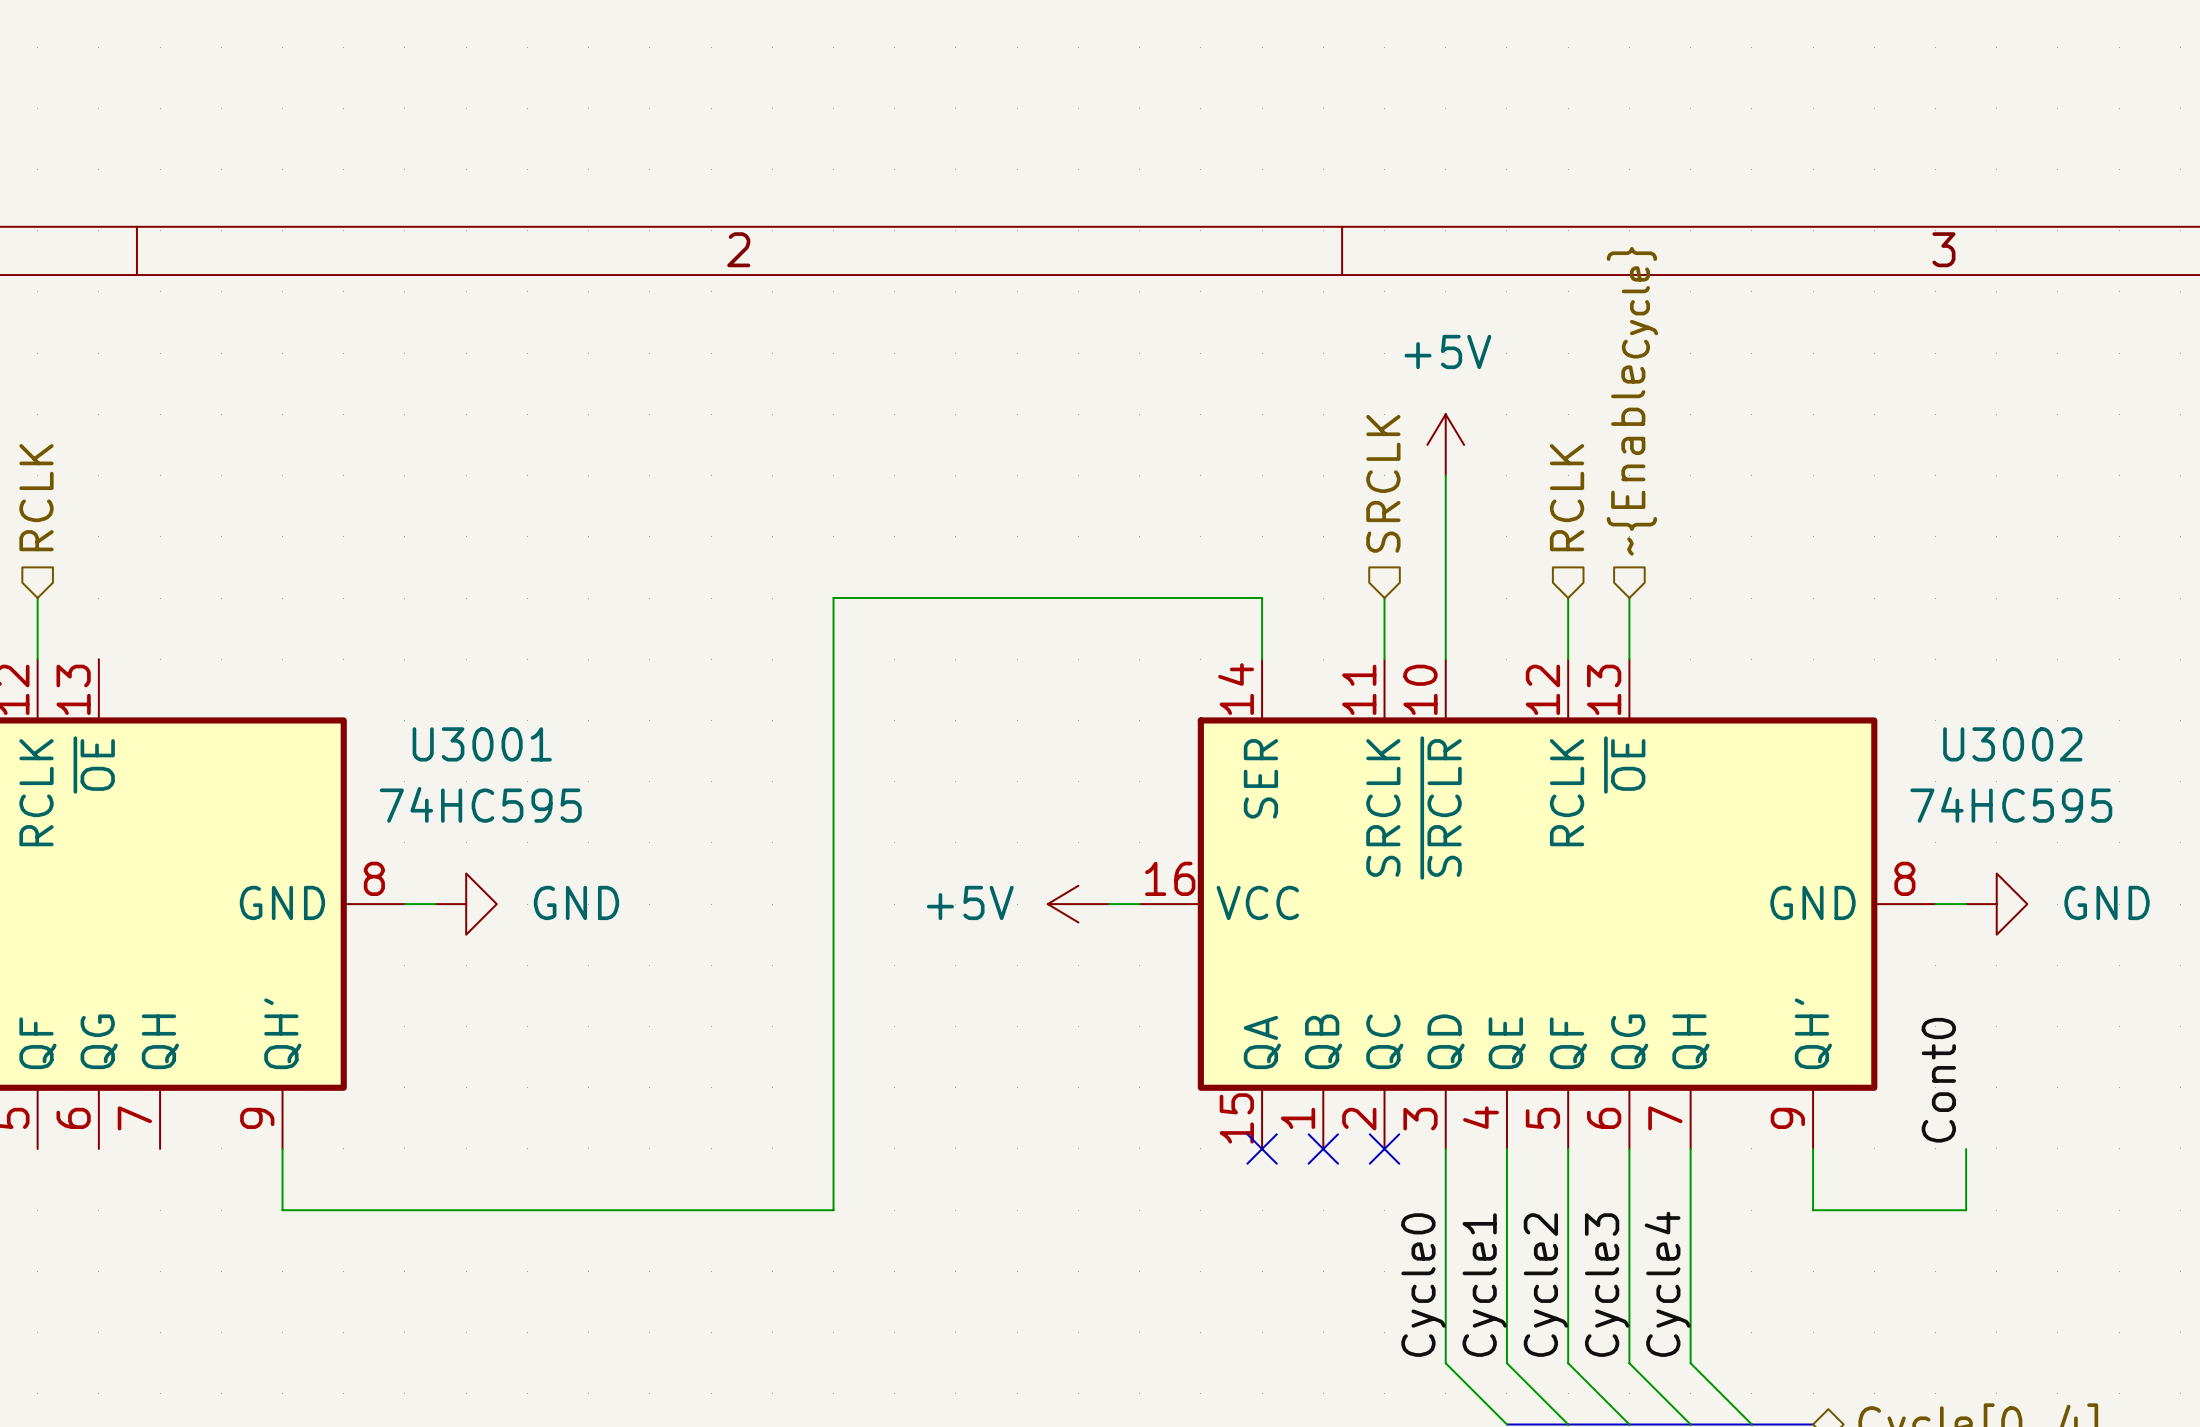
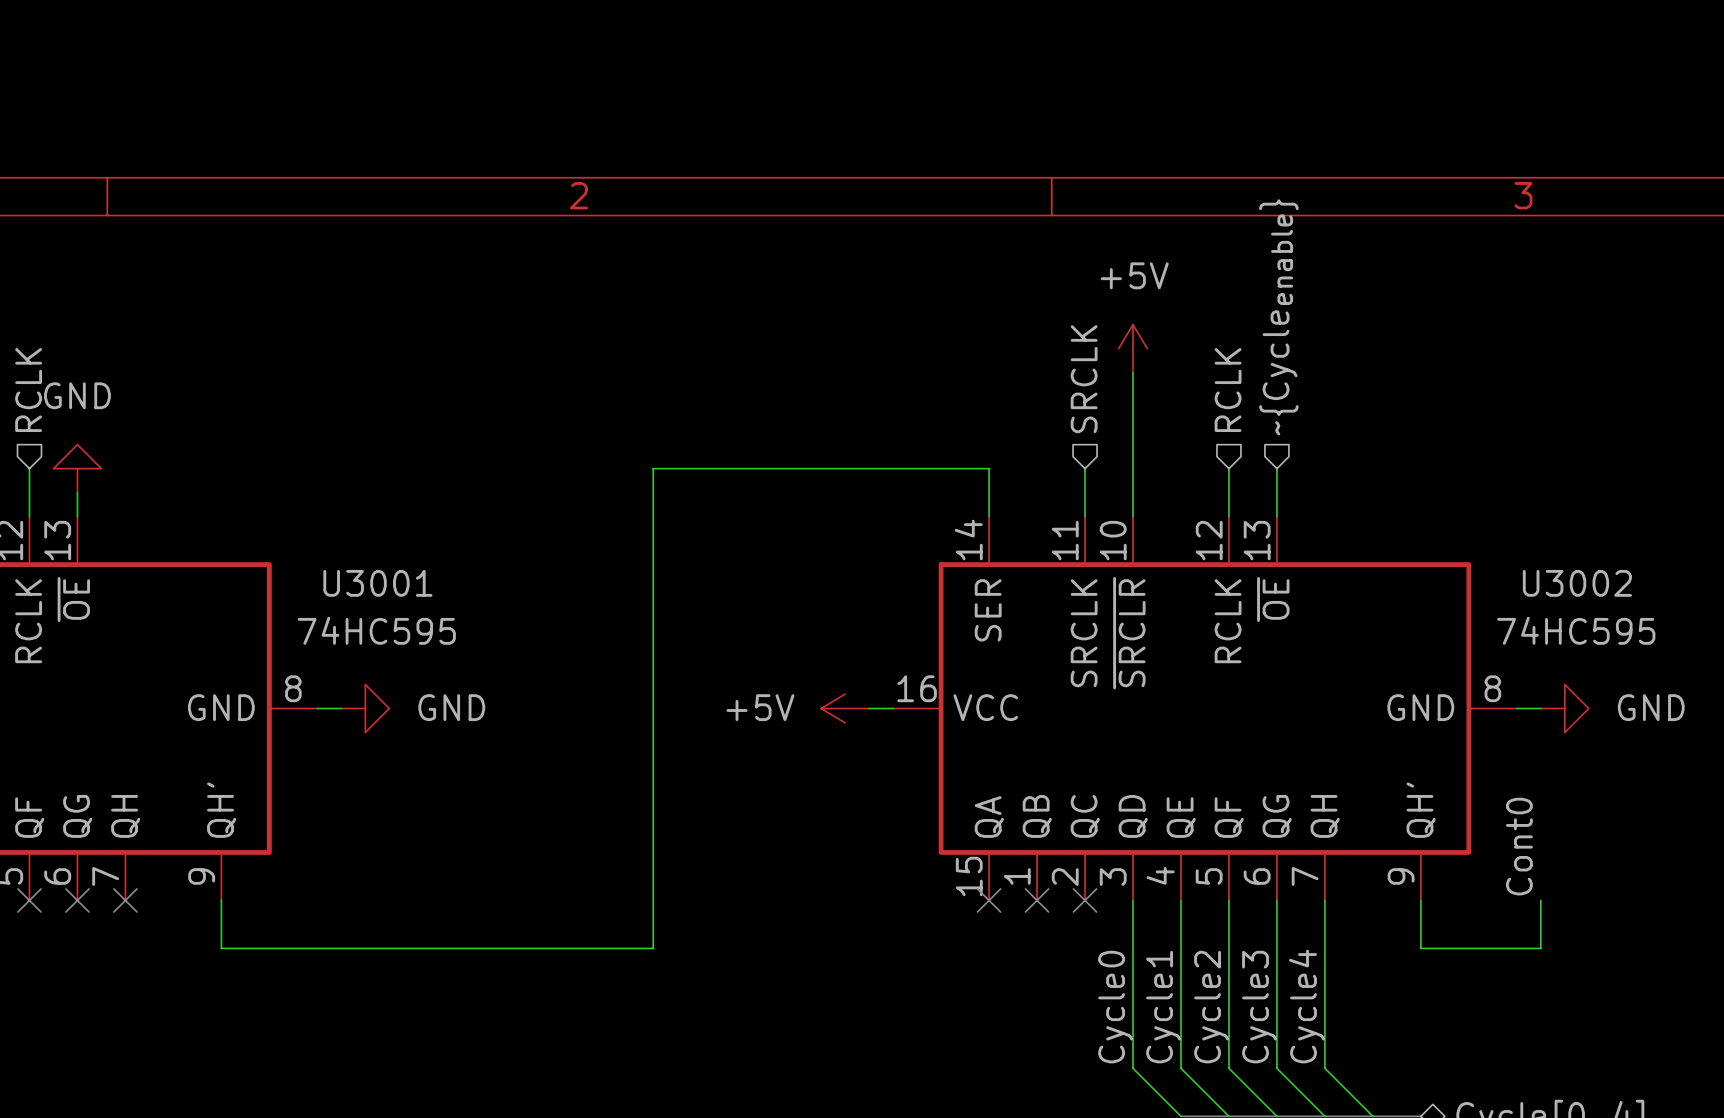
hierarchical label: ~{EnableCycle} (1632, 401) -> ~{Cycleenable} (1278, 317)
power symbol: none -> GND (77, 468)
wire: none -> (77, 492) (77, 516)
no-connect mark: none -> (29, 900)
no-connect mark: none -> (77, 900)
no-connect mark: none -> (125, 900)

